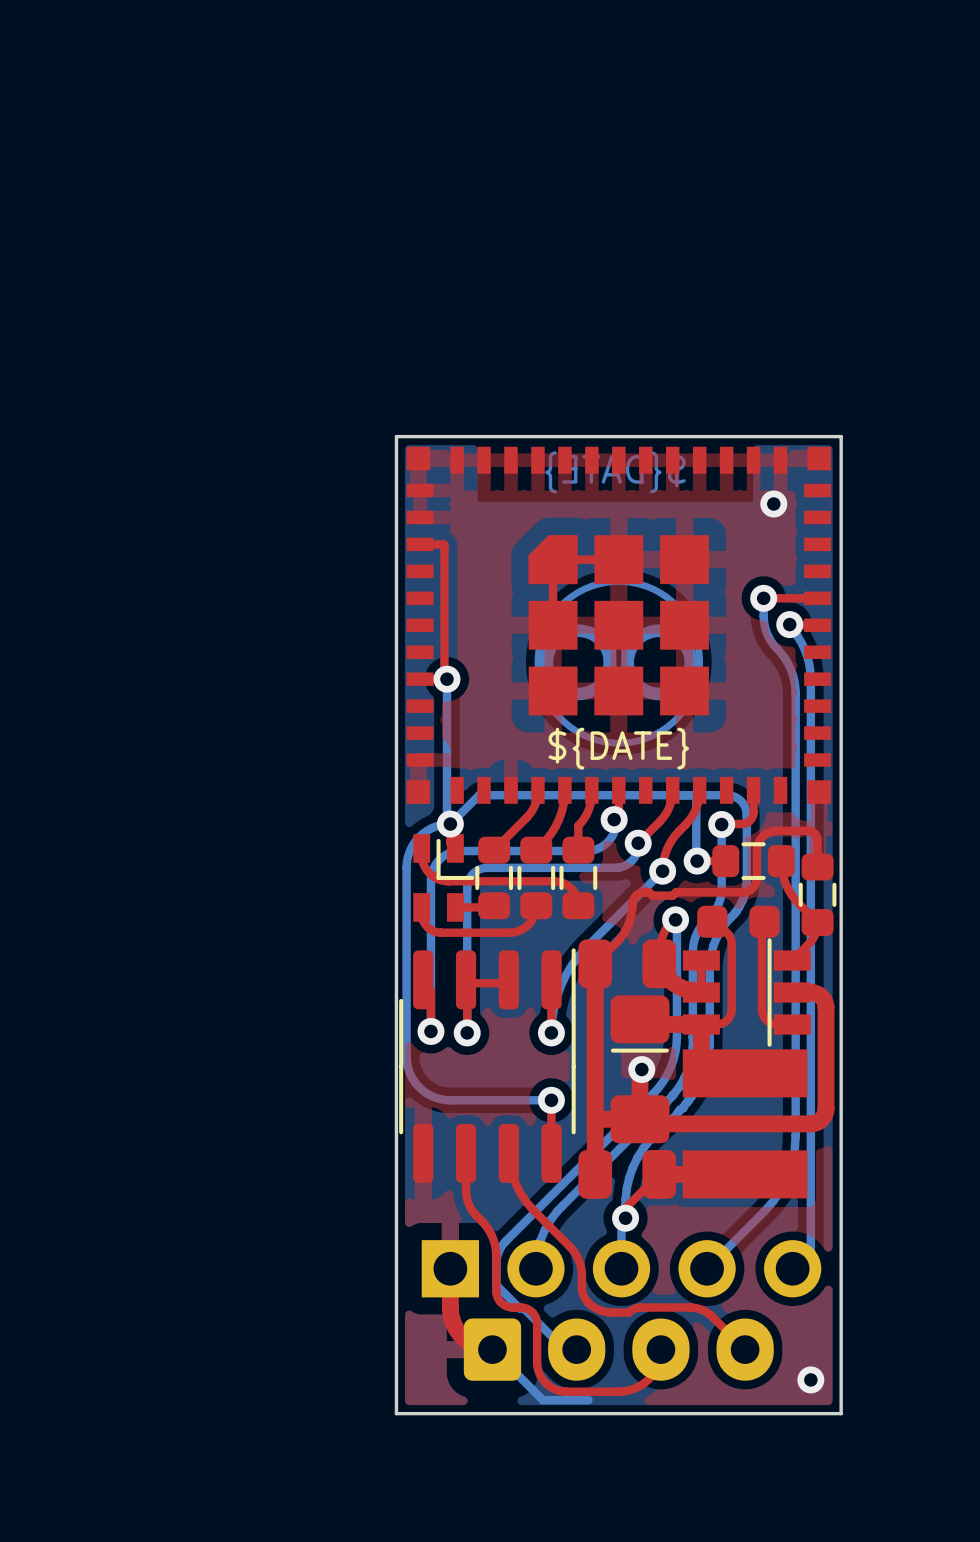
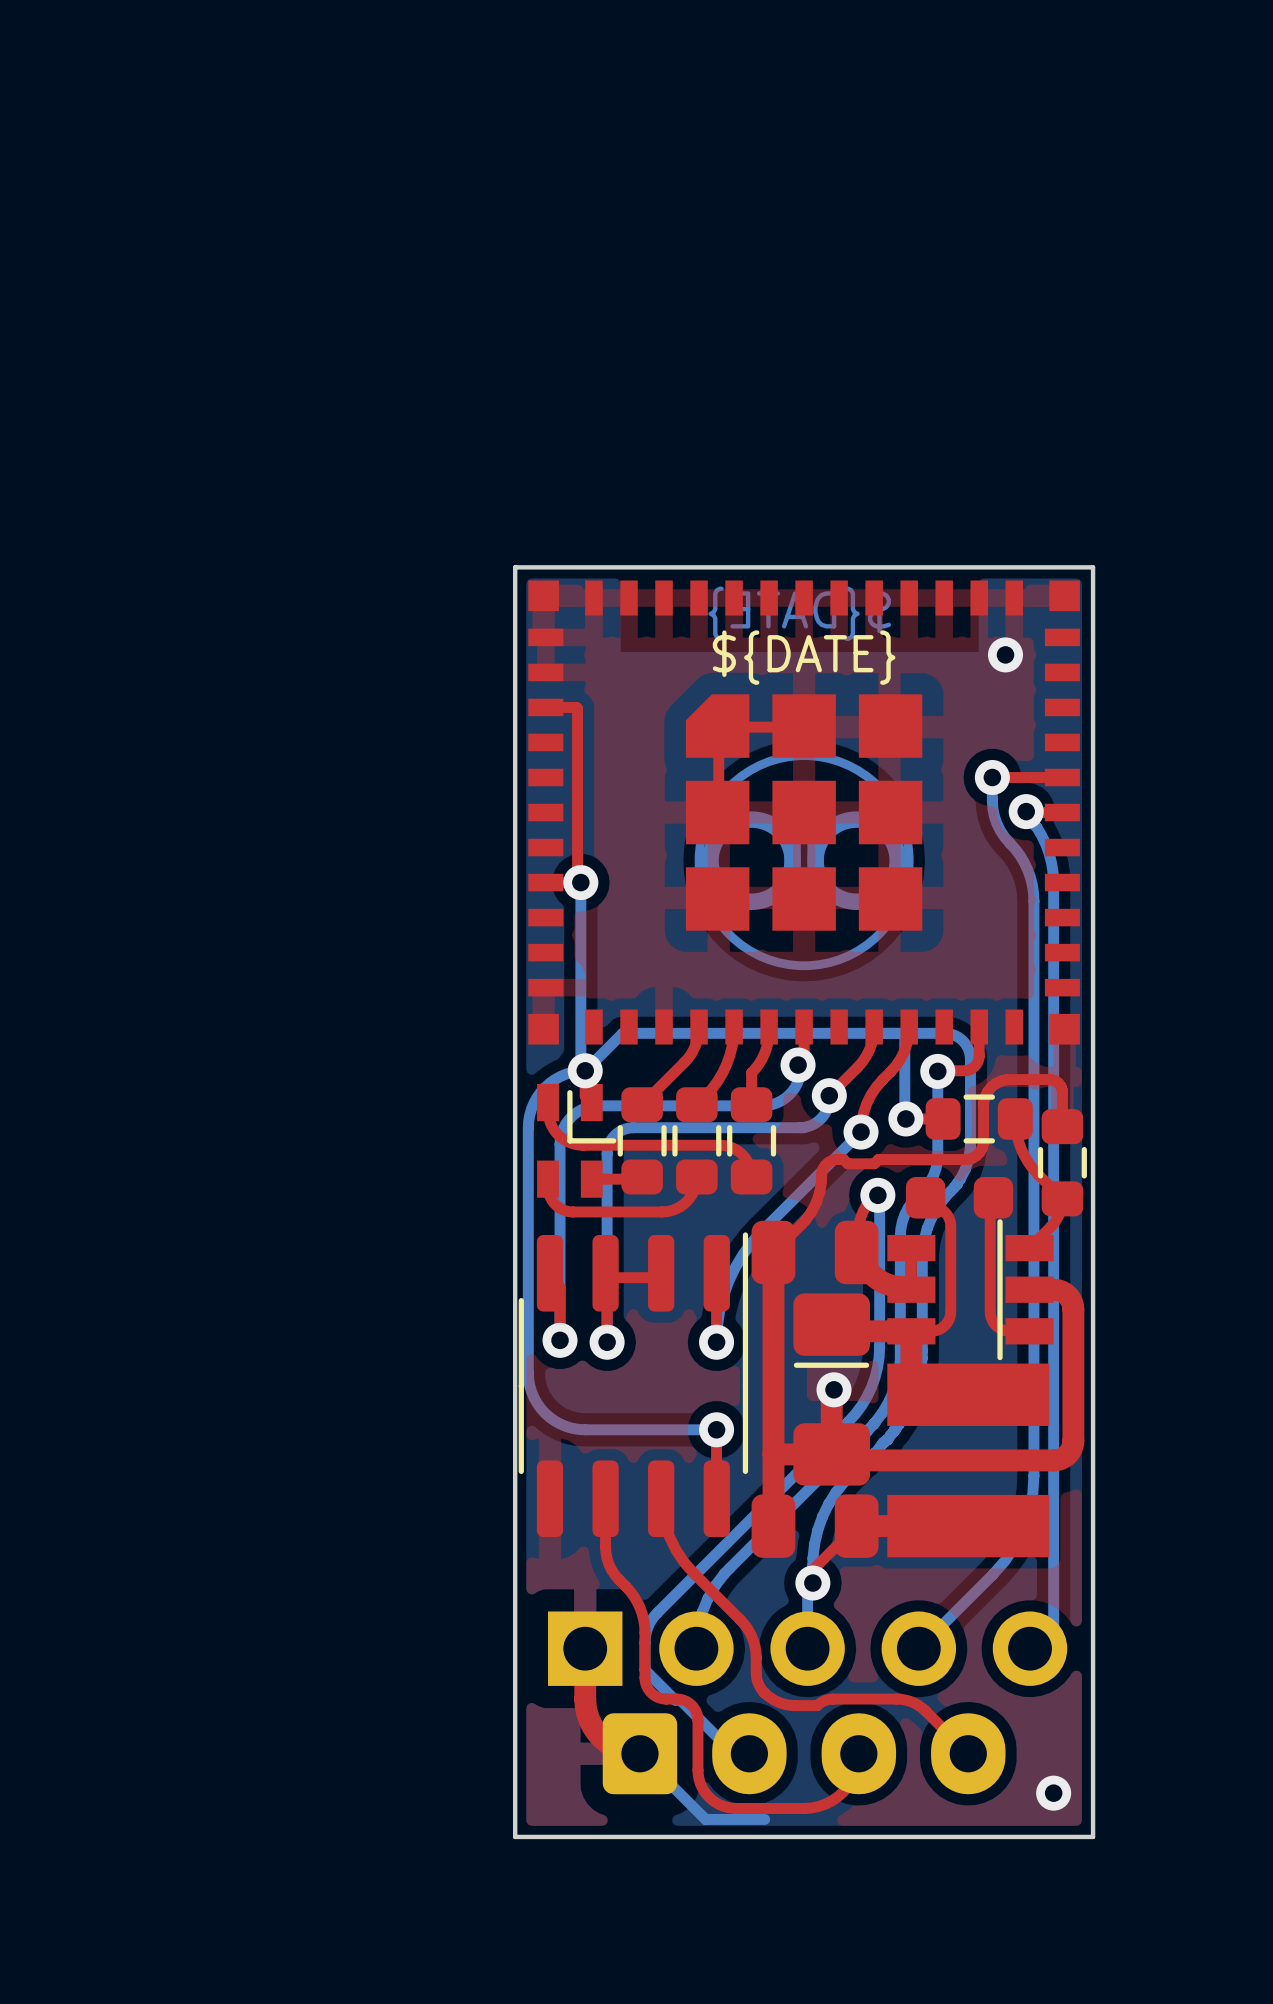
part footprint: [406, 446, 832, 804] -> [528, 580, 1080, 1045]
text: ${DATE} (618, 748) -> none

